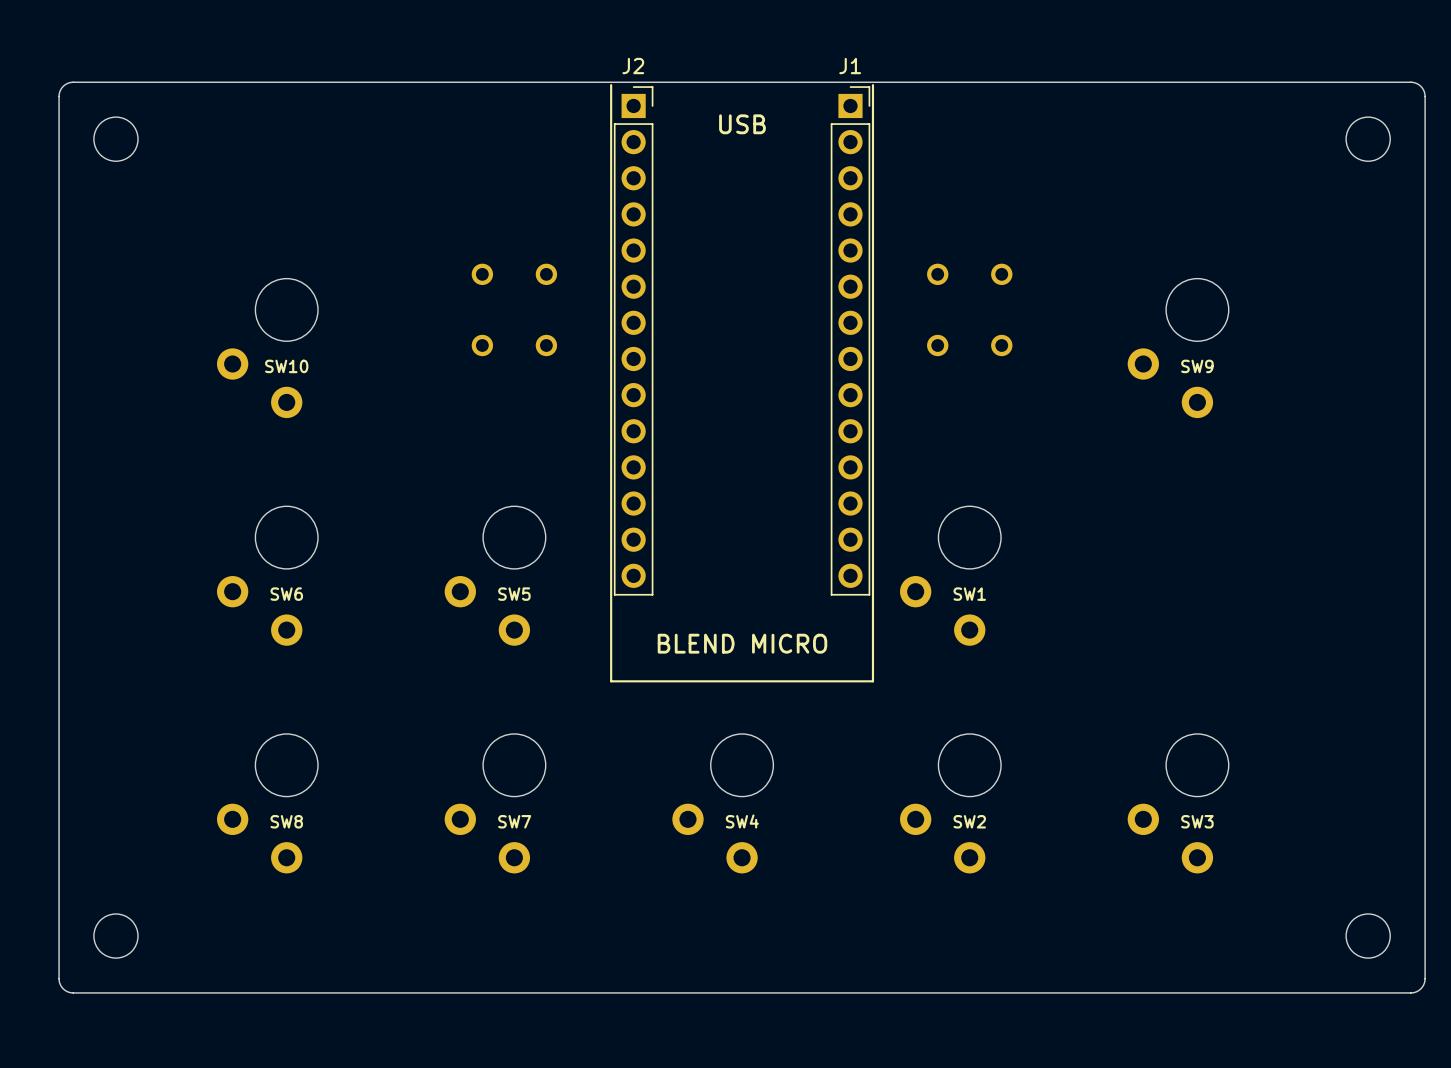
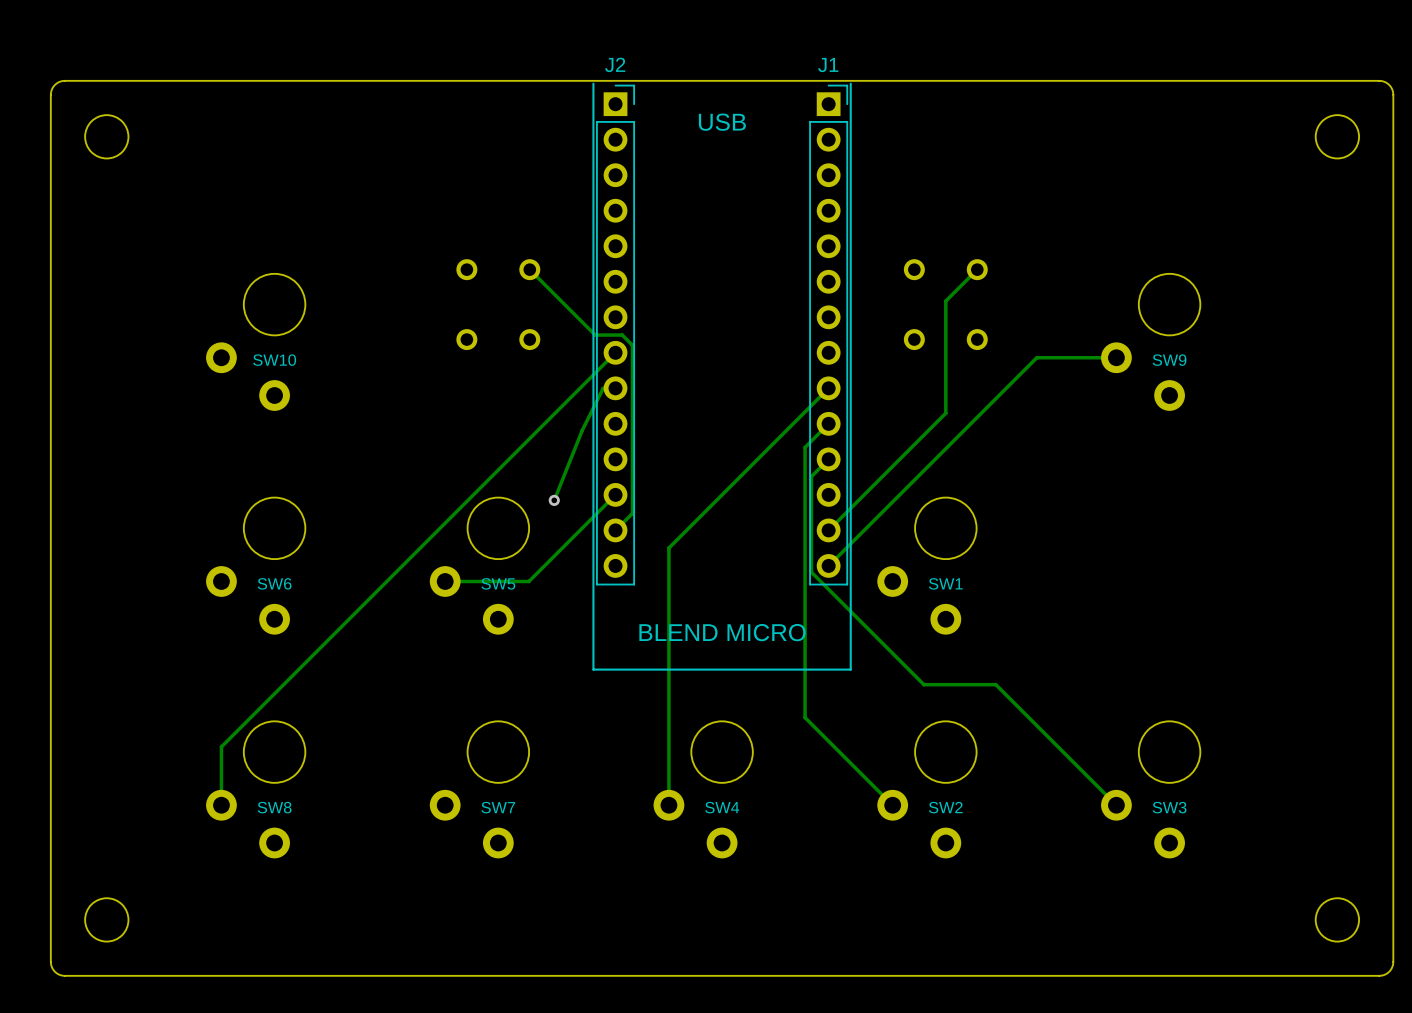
track: none -> (529, 269) (595, 335) (622, 335) (632, 345) (632, 513) (615, 530)
track: none -> (977, 269) (945, 301) (945, 413) (828, 530)
track: none -> (615, 352) (221, 746) (221, 805)
track: none -> (1116, 357) (1036, 357) (828, 565)
track: none -> (615, 388) (603, 388) (582, 430) (554, 500)
track: none -> (828, 388) (668, 548) (668, 805)
track: none -> (828, 423) (805, 447) (805, 717) (892, 805)
track: none -> (828, 459) (811, 476) (811, 572) (923, 684) (995, 684) (1116, 805)
track: none -> (615, 494) (528, 581) (445, 581)
via: none -> (554, 500)

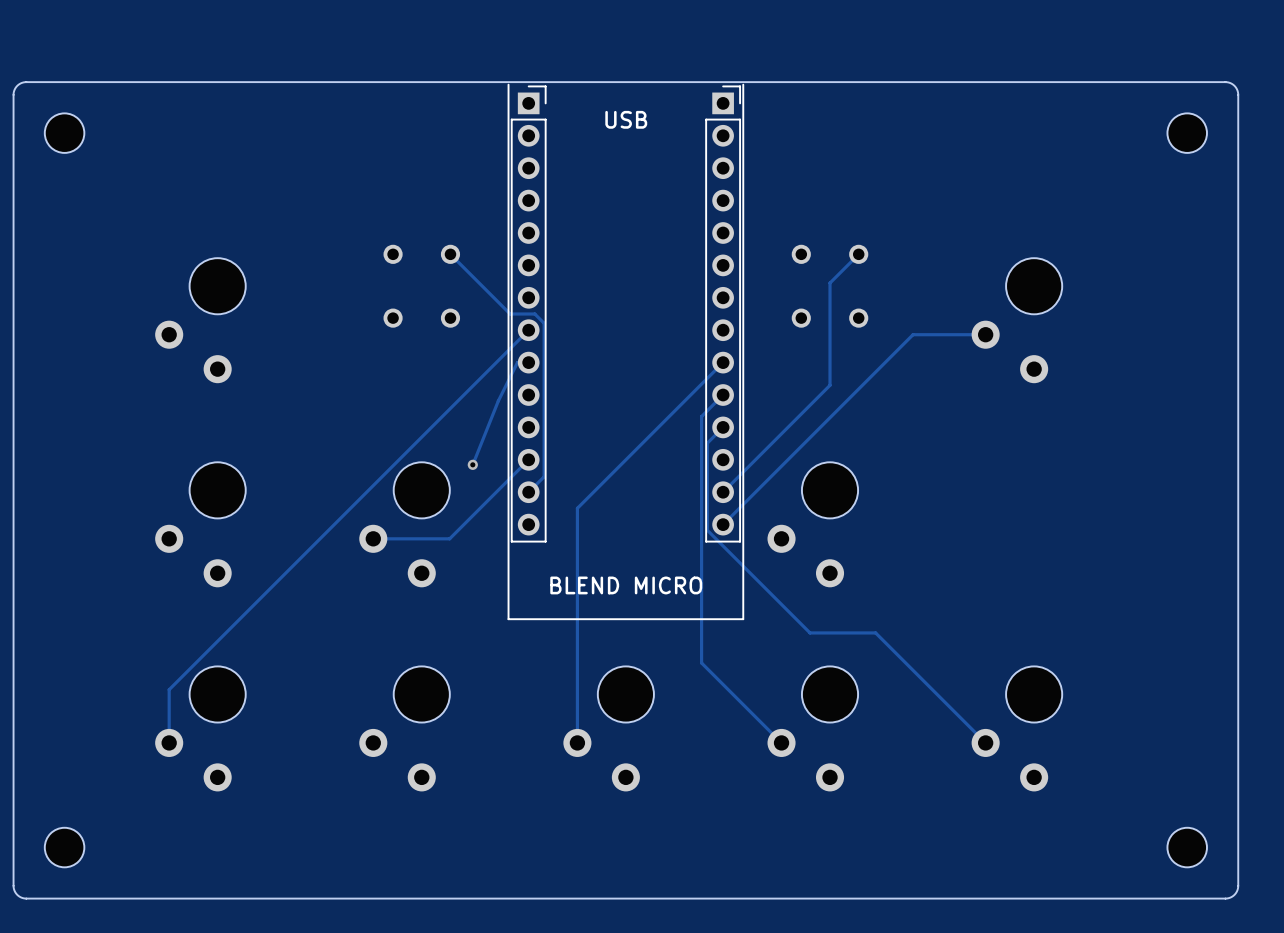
J2 name: J2 (615, 64) -> none
J1 name: J1 (828, 65) -> none
SW10 name: SW10 (274, 360) -> none
SW9 name: SW9 (1169, 360) -> none
SW6 name: SW6 (274, 583) -> none
SW5 name: SW5 (498, 583) -> none
SW1 name: SW1 (945, 583) -> none
SW8 name: SW8 (274, 807) -> none
SW7 name: SW7 (498, 807) -> none
SW4 name: SW4 (722, 807) -> none
SW2 name: SW2 (945, 807) -> none
SW3 name: SW3 (1169, 807) -> none

